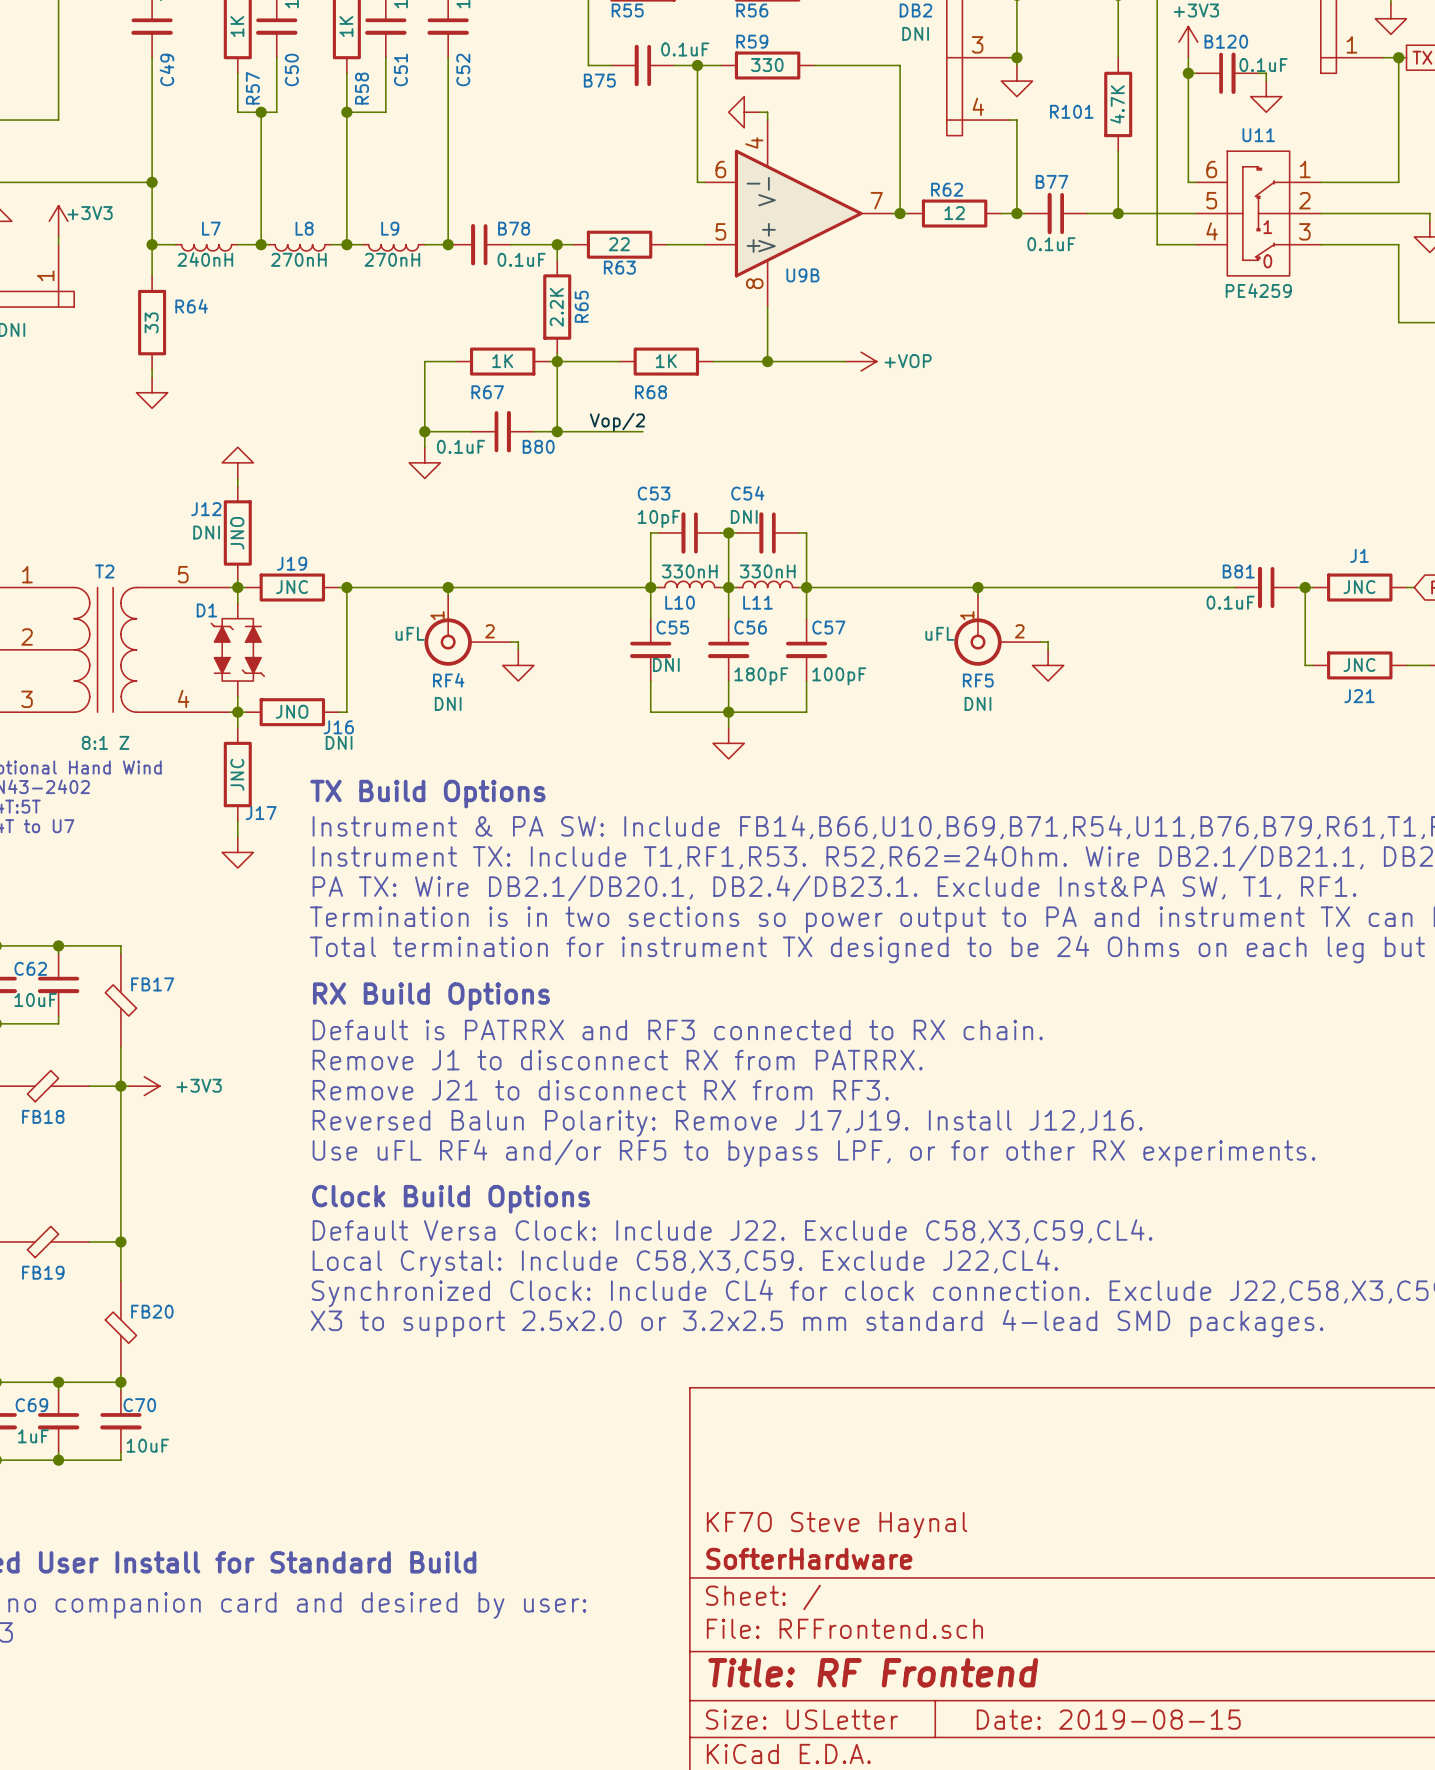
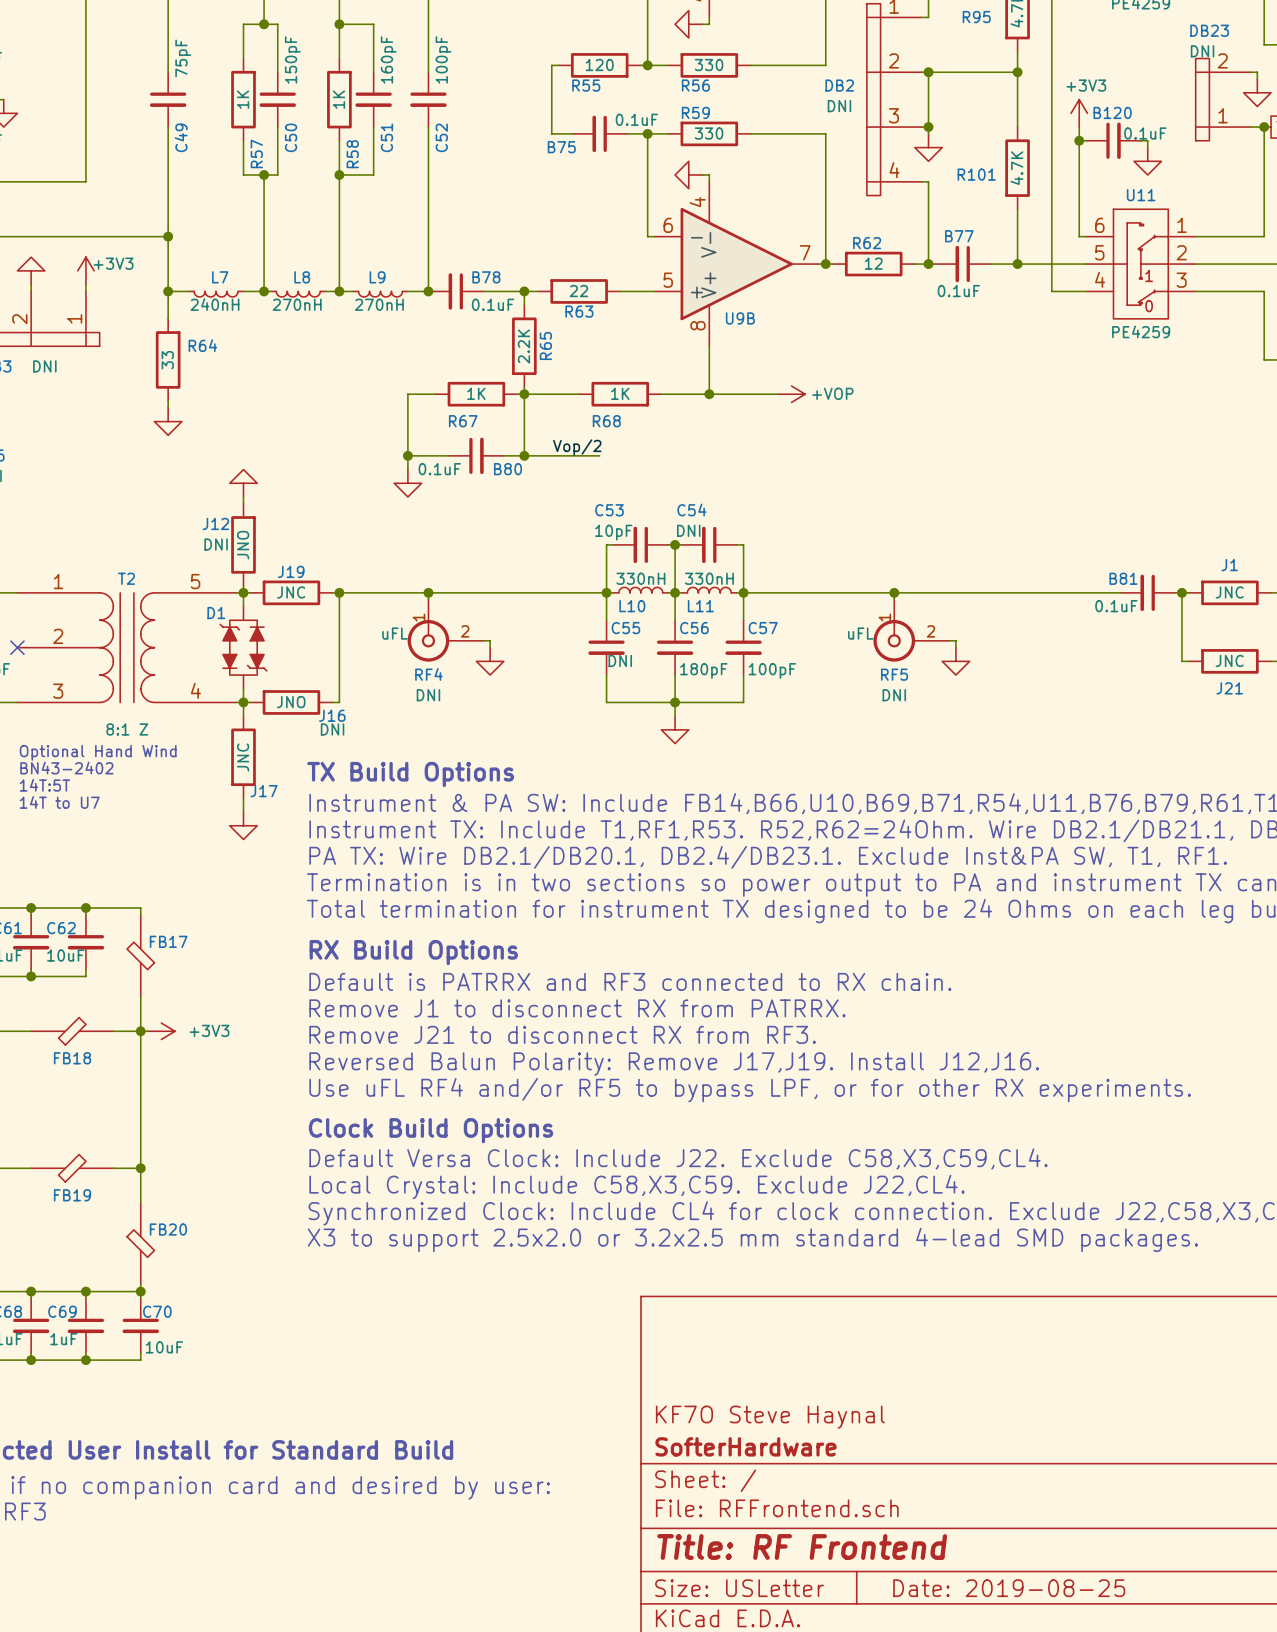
title block: Date: 2019-08-15 (1108, 1719) -> Date: 2019-08-25 (1009, 1588)

